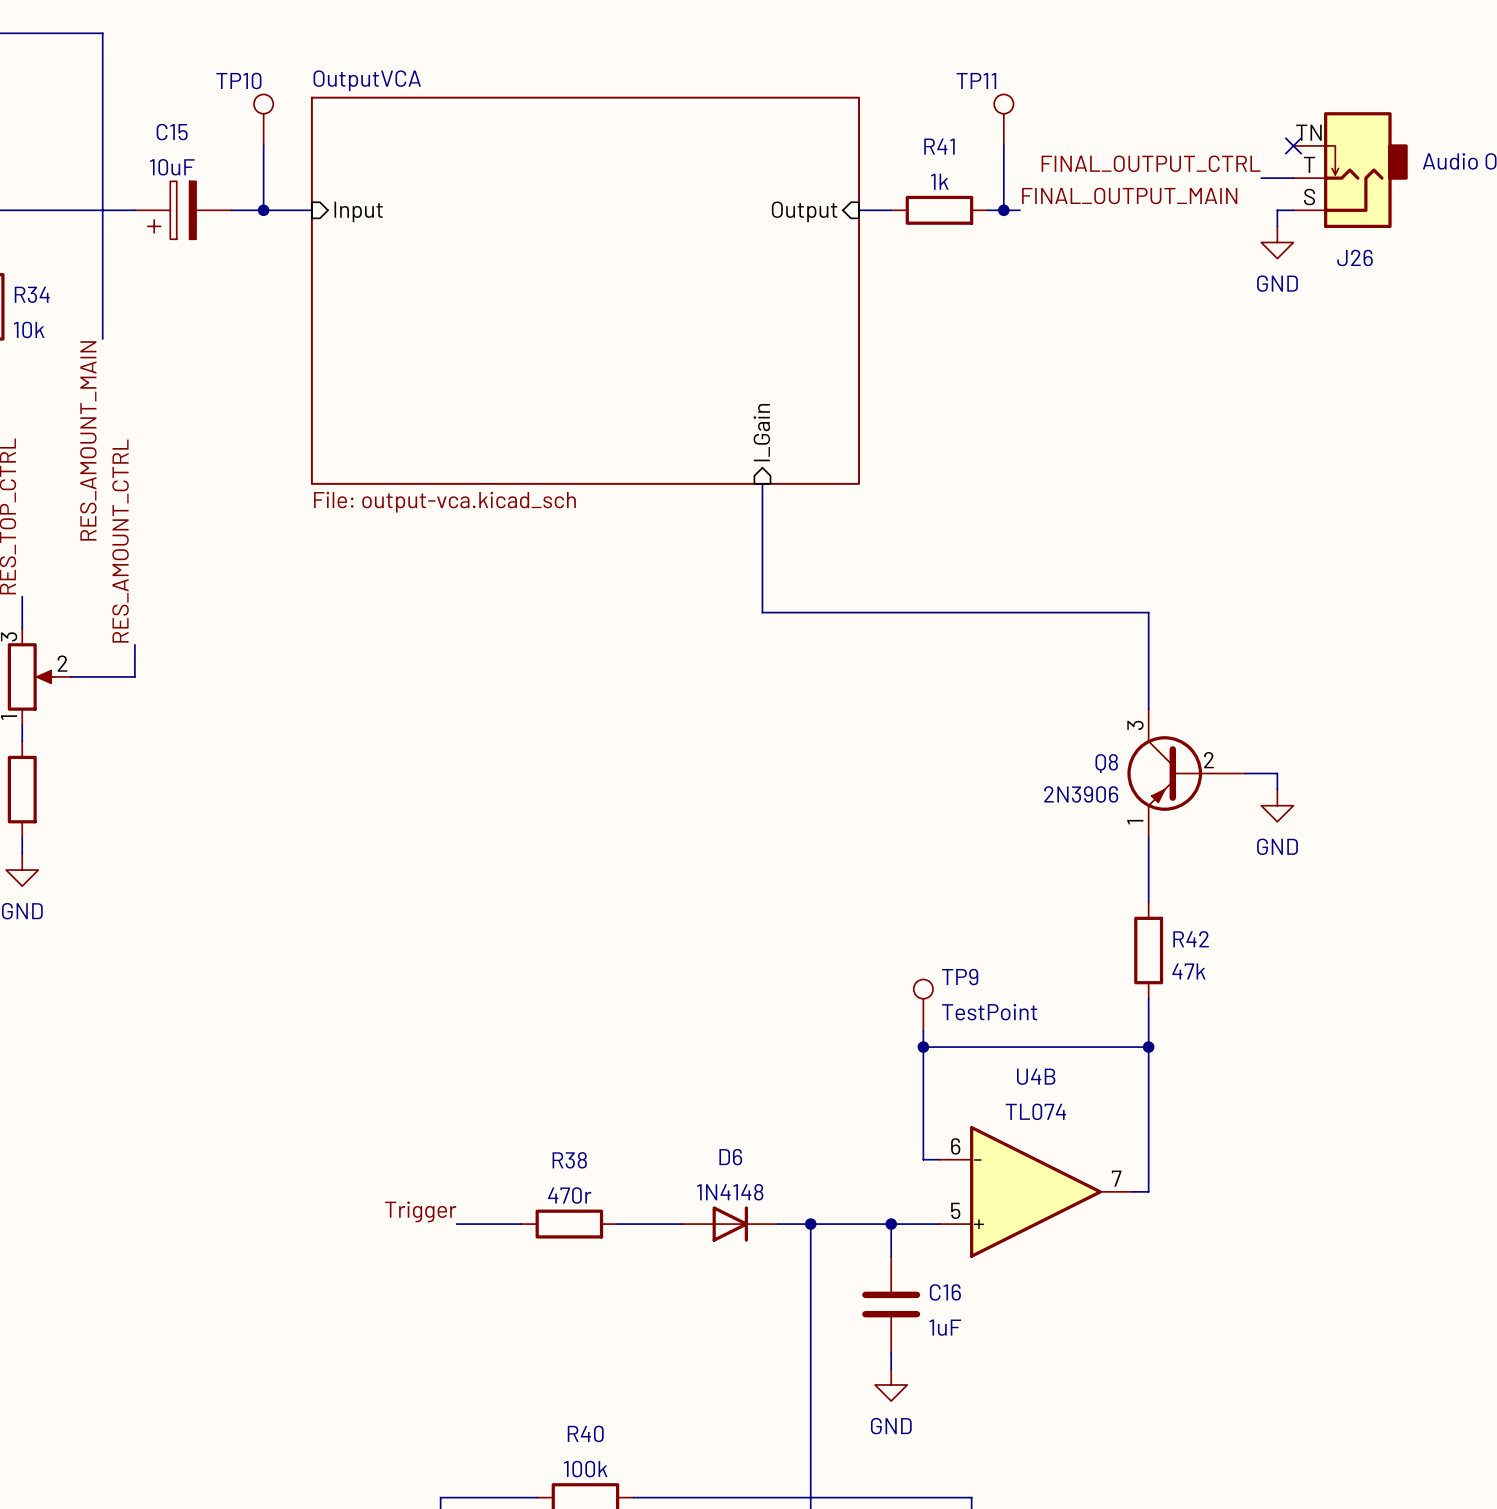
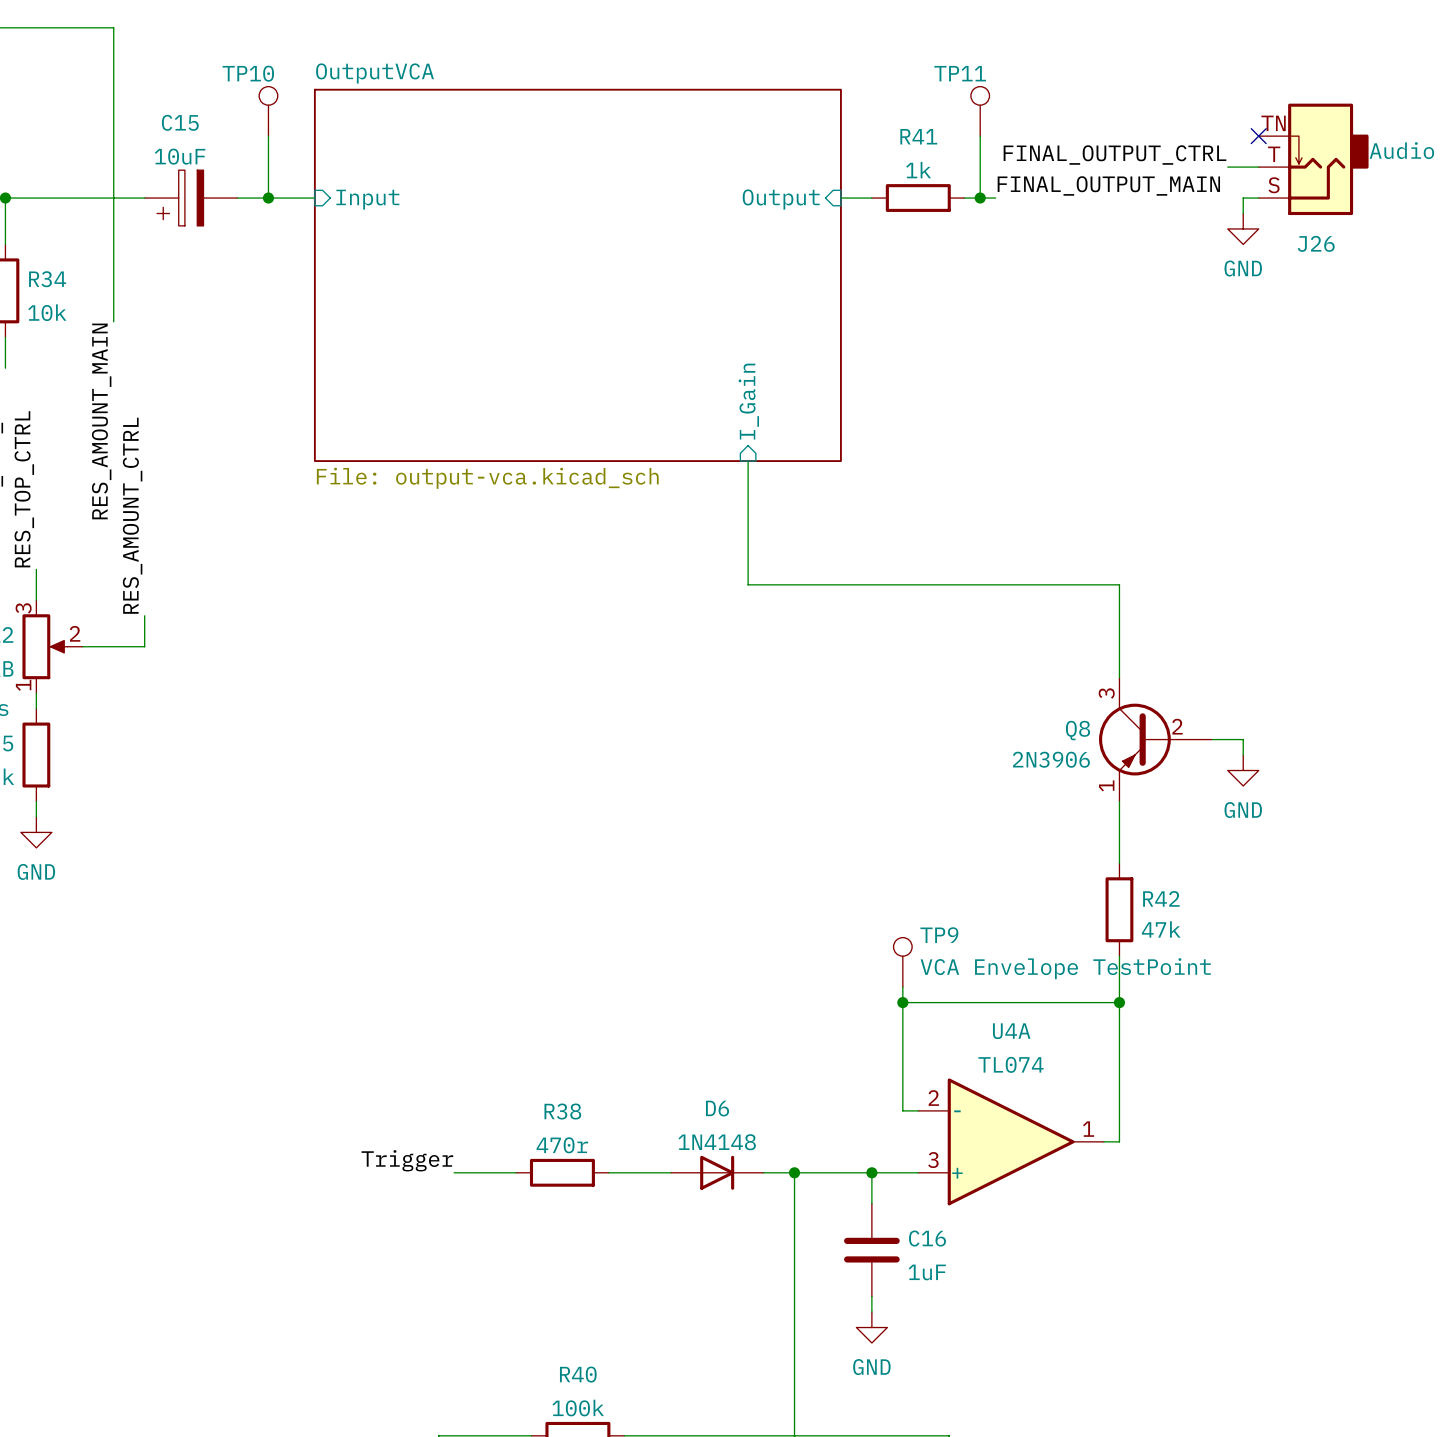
TP9 value: TestPoint (989, 1012) -> VCA Envelope TestPoint (1065, 968)
U4B name: U4B (1036, 1076) -> U4A (1011, 1031)
U4B pin number: 6 (955, 1146) -> 2 (933, 1098)
U4B pin number: 7 (1116, 1178) -> 1 (1088, 1129)
U4B pin number: 5 (955, 1210) -> 3 (933, 1160)

